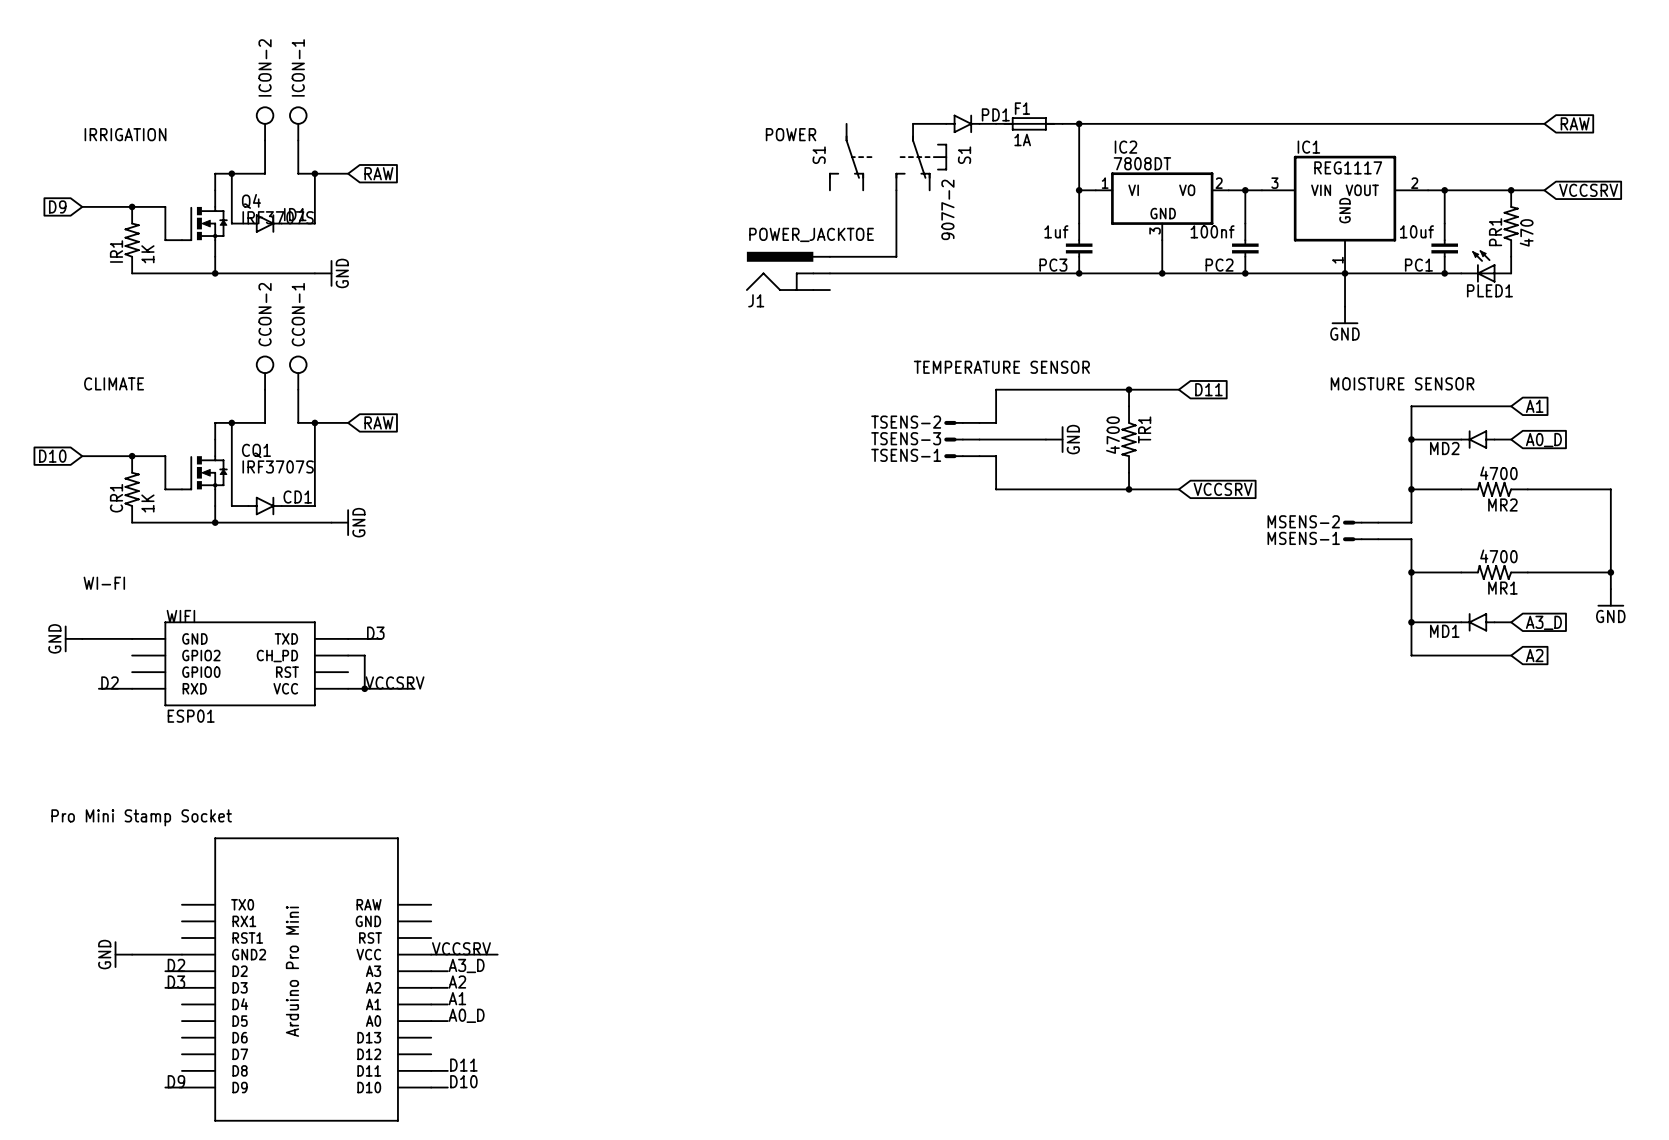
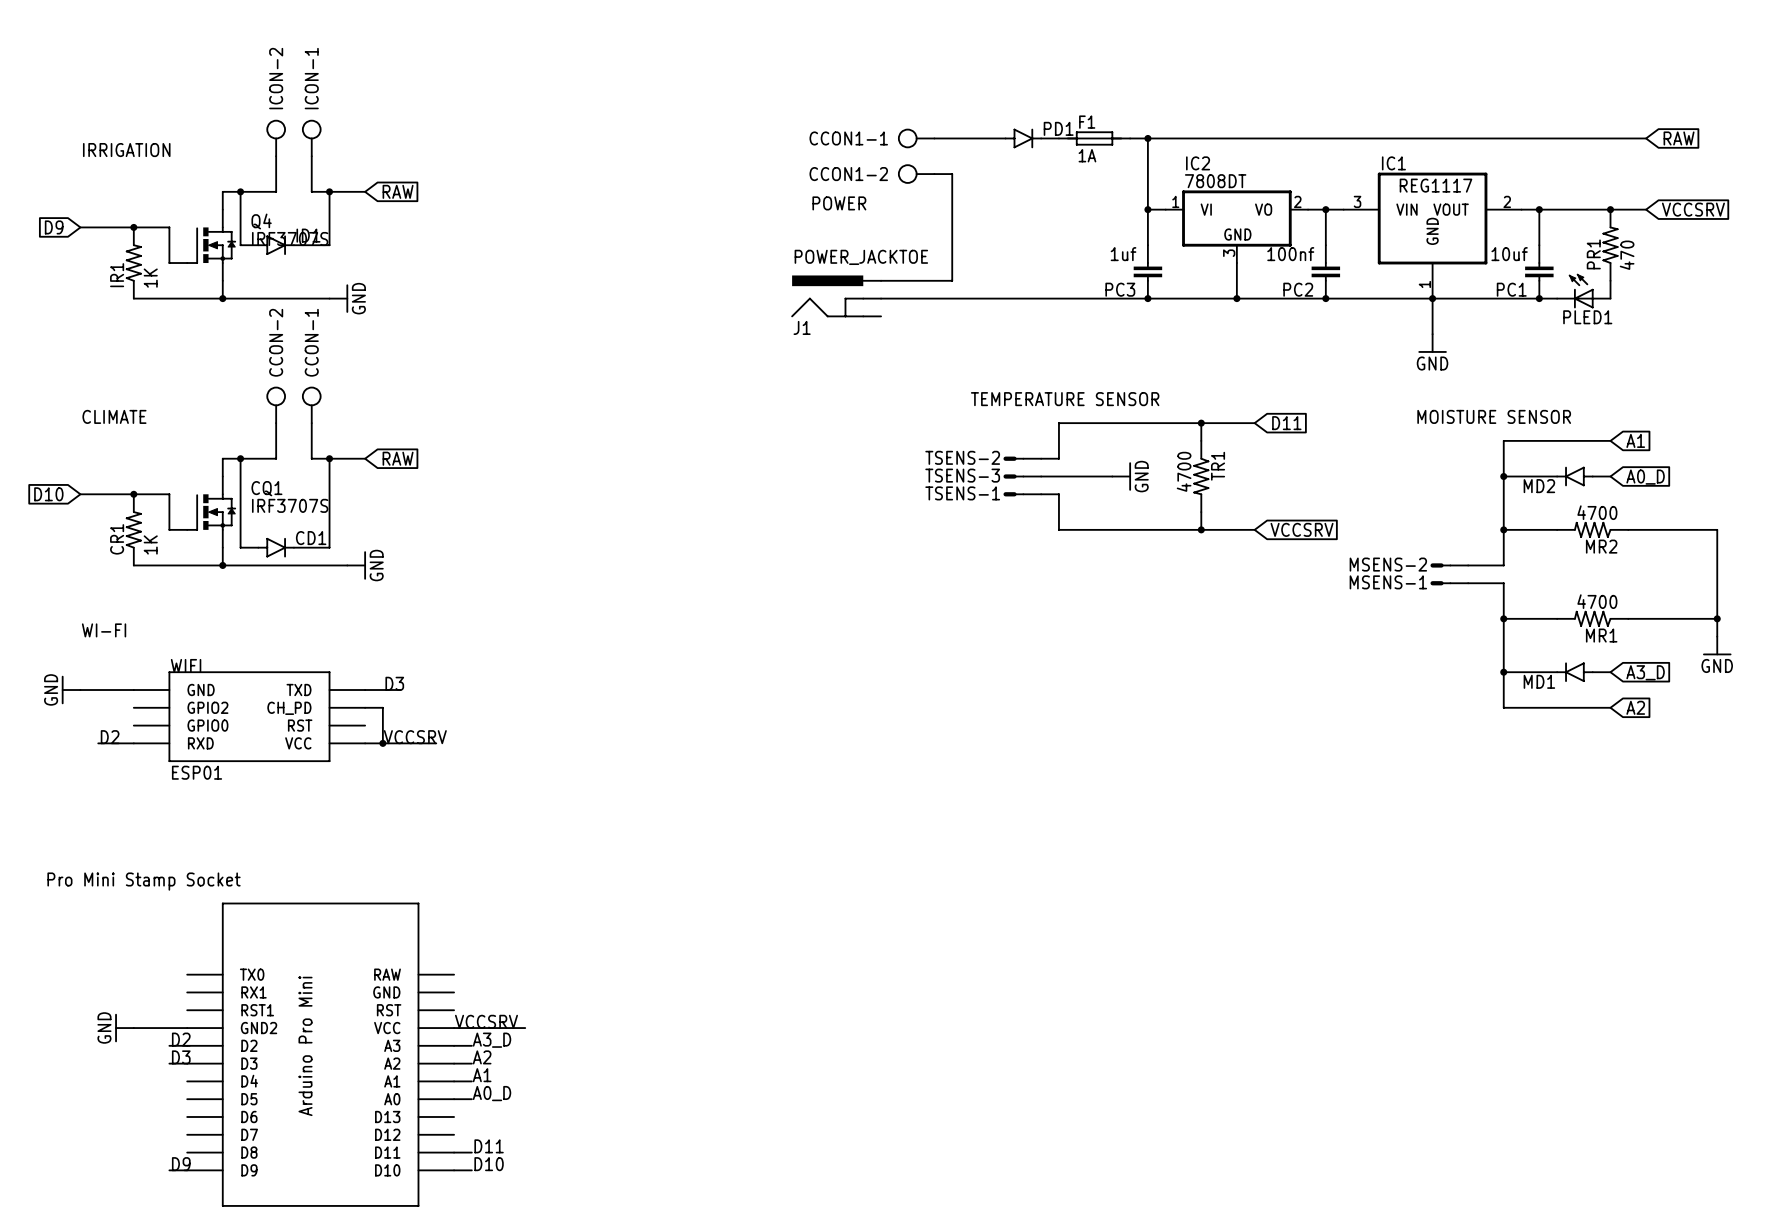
CCON1-1: none -> (916, 138)
wire: none -> (934, 138) (970, 138)
text position: POWER (791, 134) -> POWER (839, 203)
S1: (850, 157) -> none
CCON1-2: none -> (916, 174)
wire: none -> (934, 174) (952, 174) (952, 209)
S1: 9077-2 (921, 157) -> none

